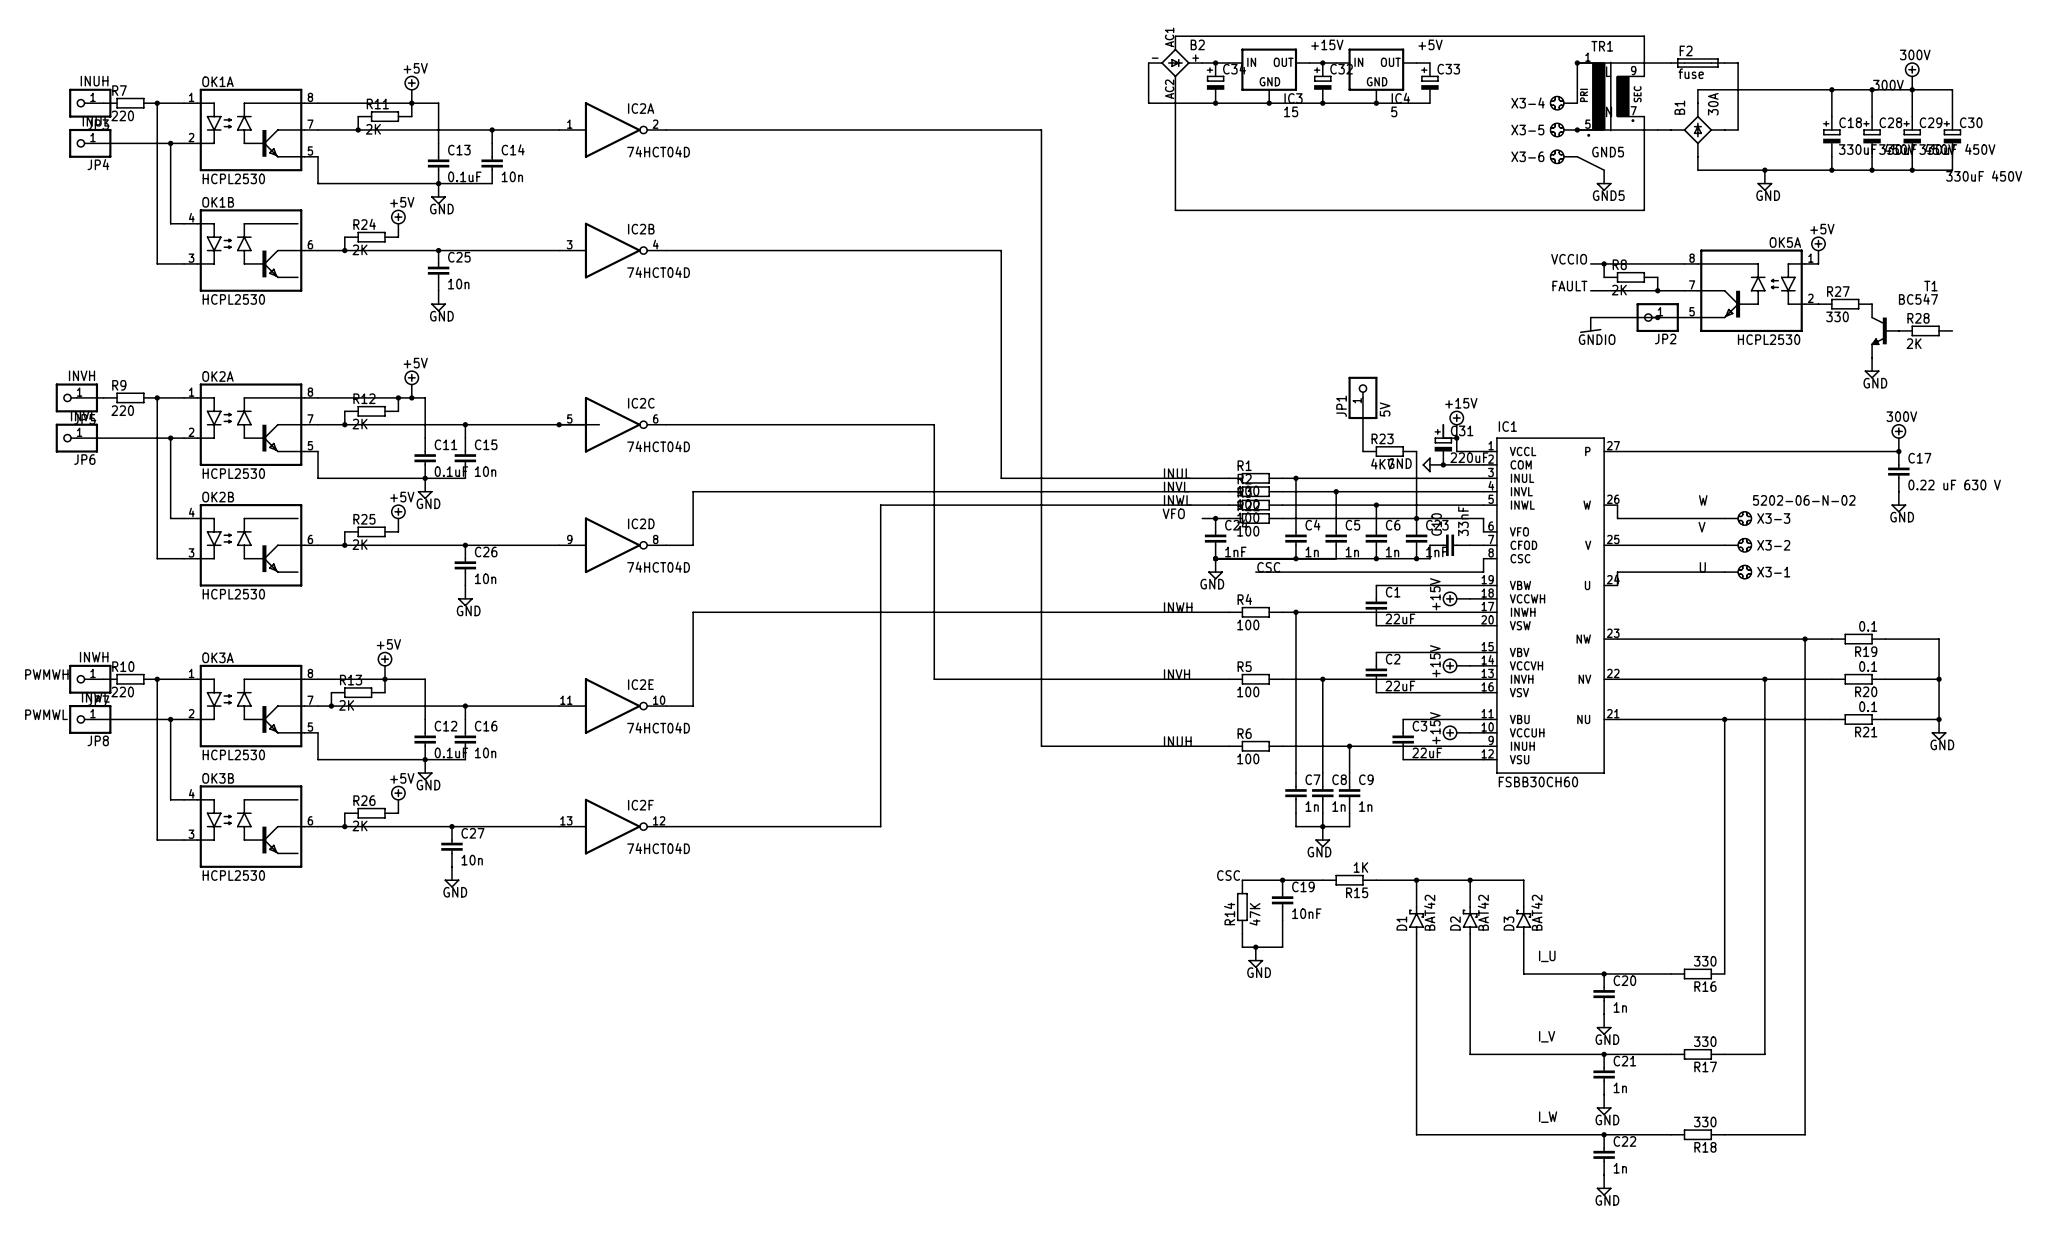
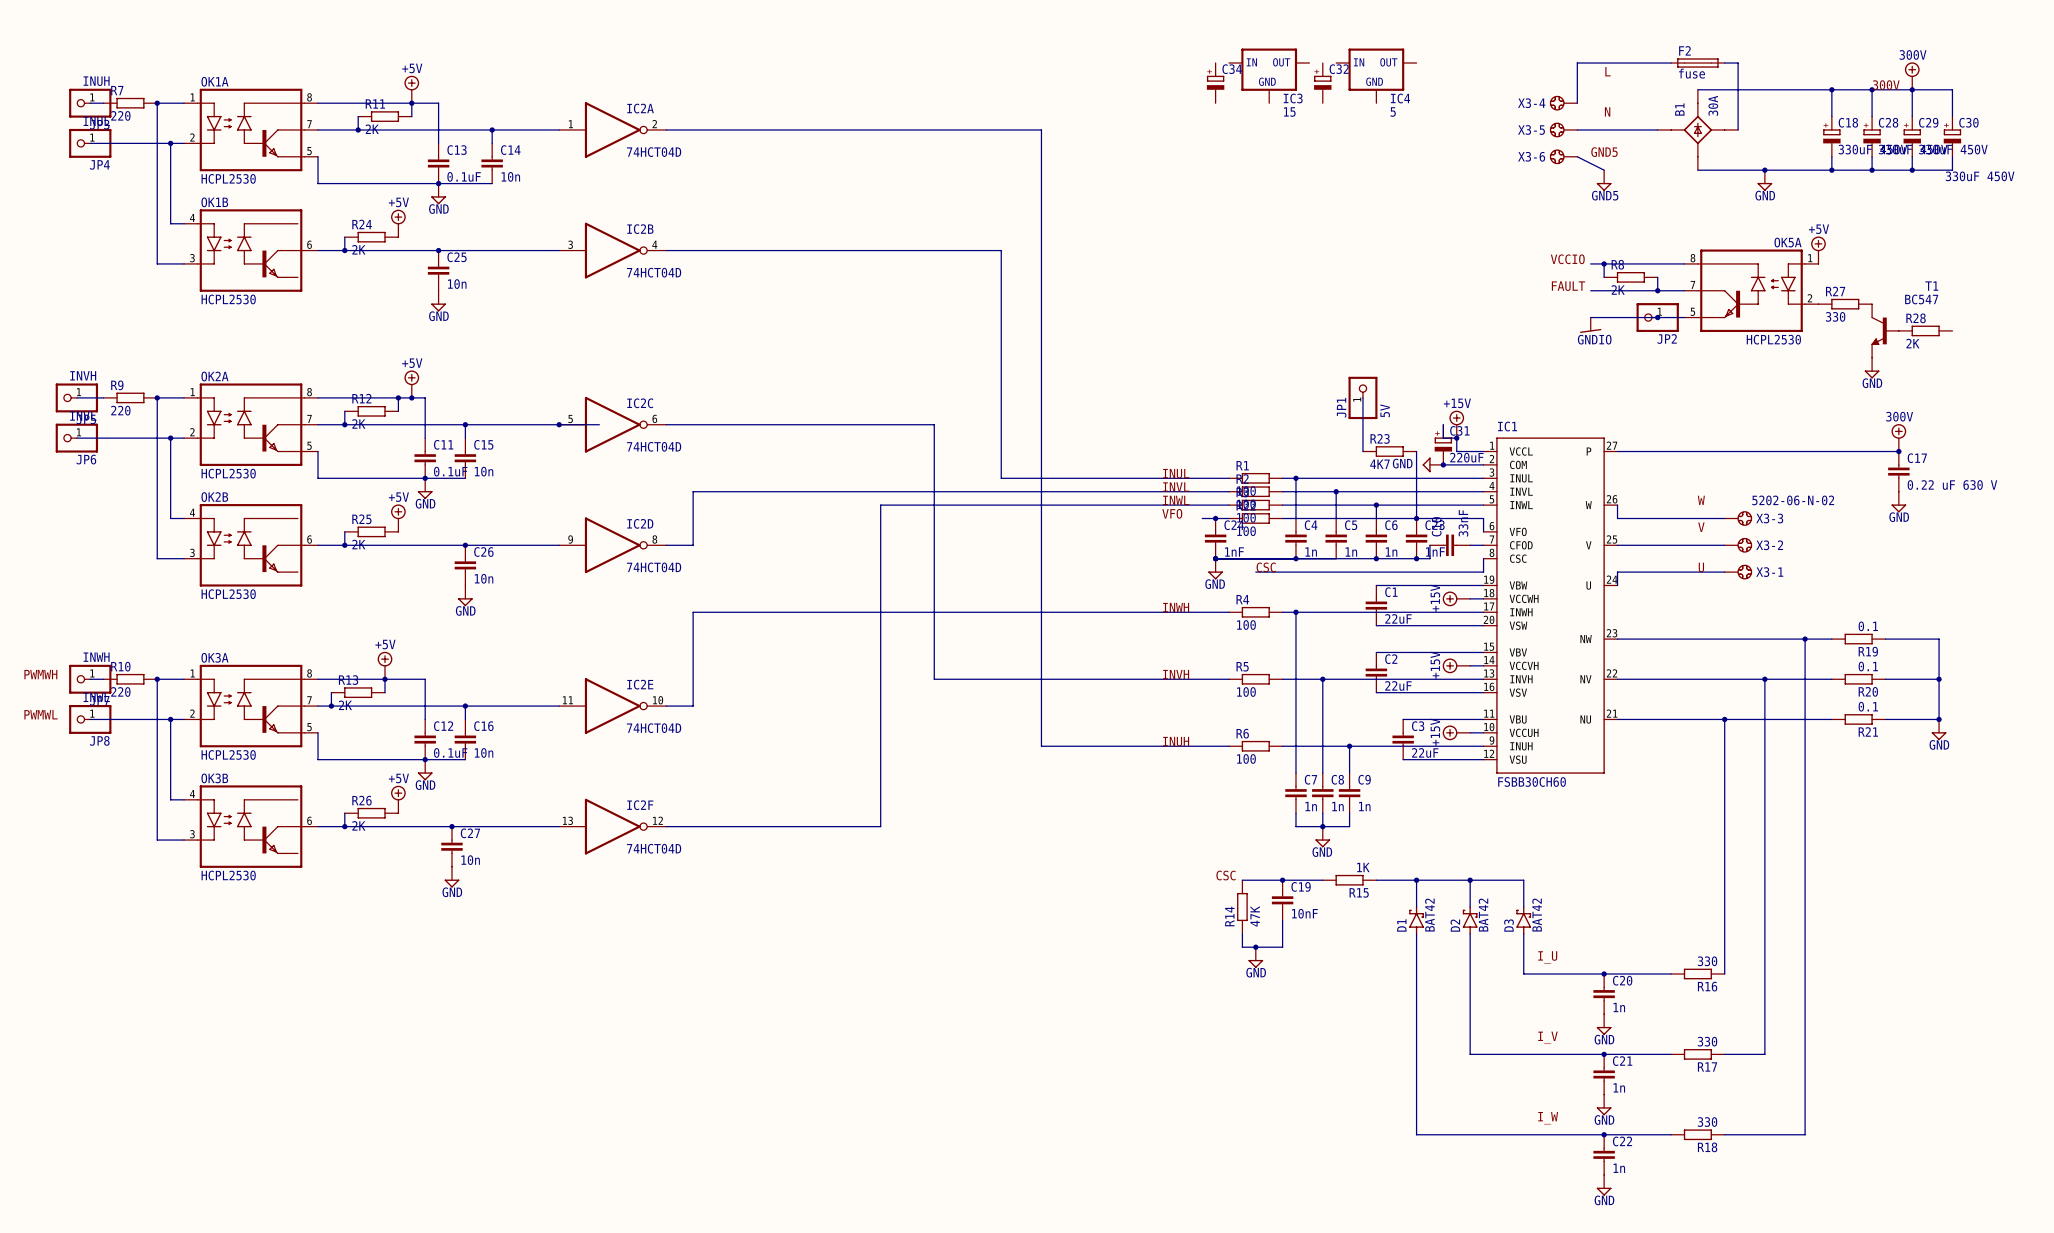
wire: (1175, 36) (1644, 36) (1644, 76) -> none
label: +15V (1327, 44) -> none
label: +5V (1430, 44) -> none
wire: (1148, 63) (1148, 103) (1429, 103) -> none
B2: (1175, 63) -> none
wire: (1202, 63) (1229, 63) -> none
junction: (1215, 63) -> none
wire: (1309, 63) (1336, 63) -> none
junction: (1322, 63) -> none
wire: (1416, 63) (1429, 63) -> none
junction: (1577, 63) -> none
C33: (1429, 83) -> none
wire: (1175, 89) (1175, 210) (1644, 210) (1644, 116) -> none
TR1: (1610, 99) -> none
junction: (1215, 103) -> none
junction: (1269, 103) -> none
junction: (1322, 103) -> none
junction: (1376, 103) -> none
junction: (1577, 129) -> none

